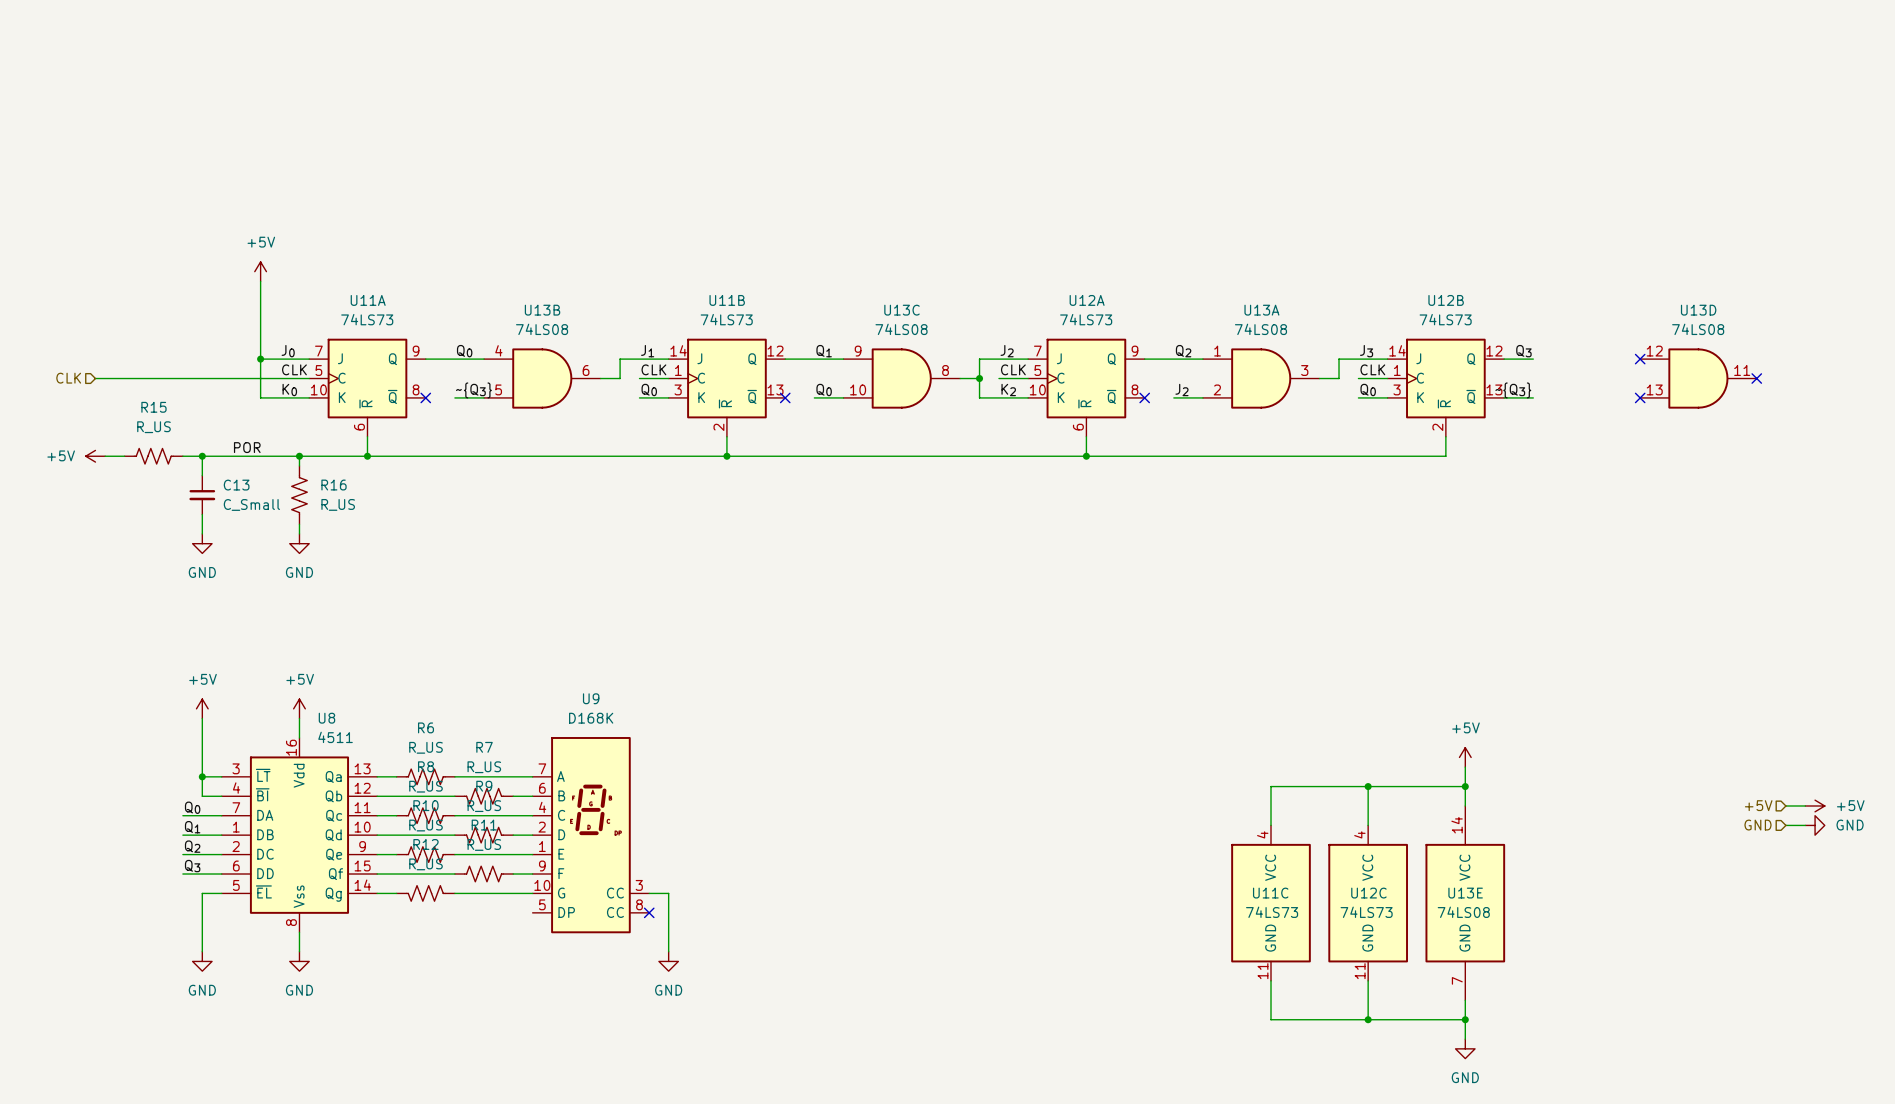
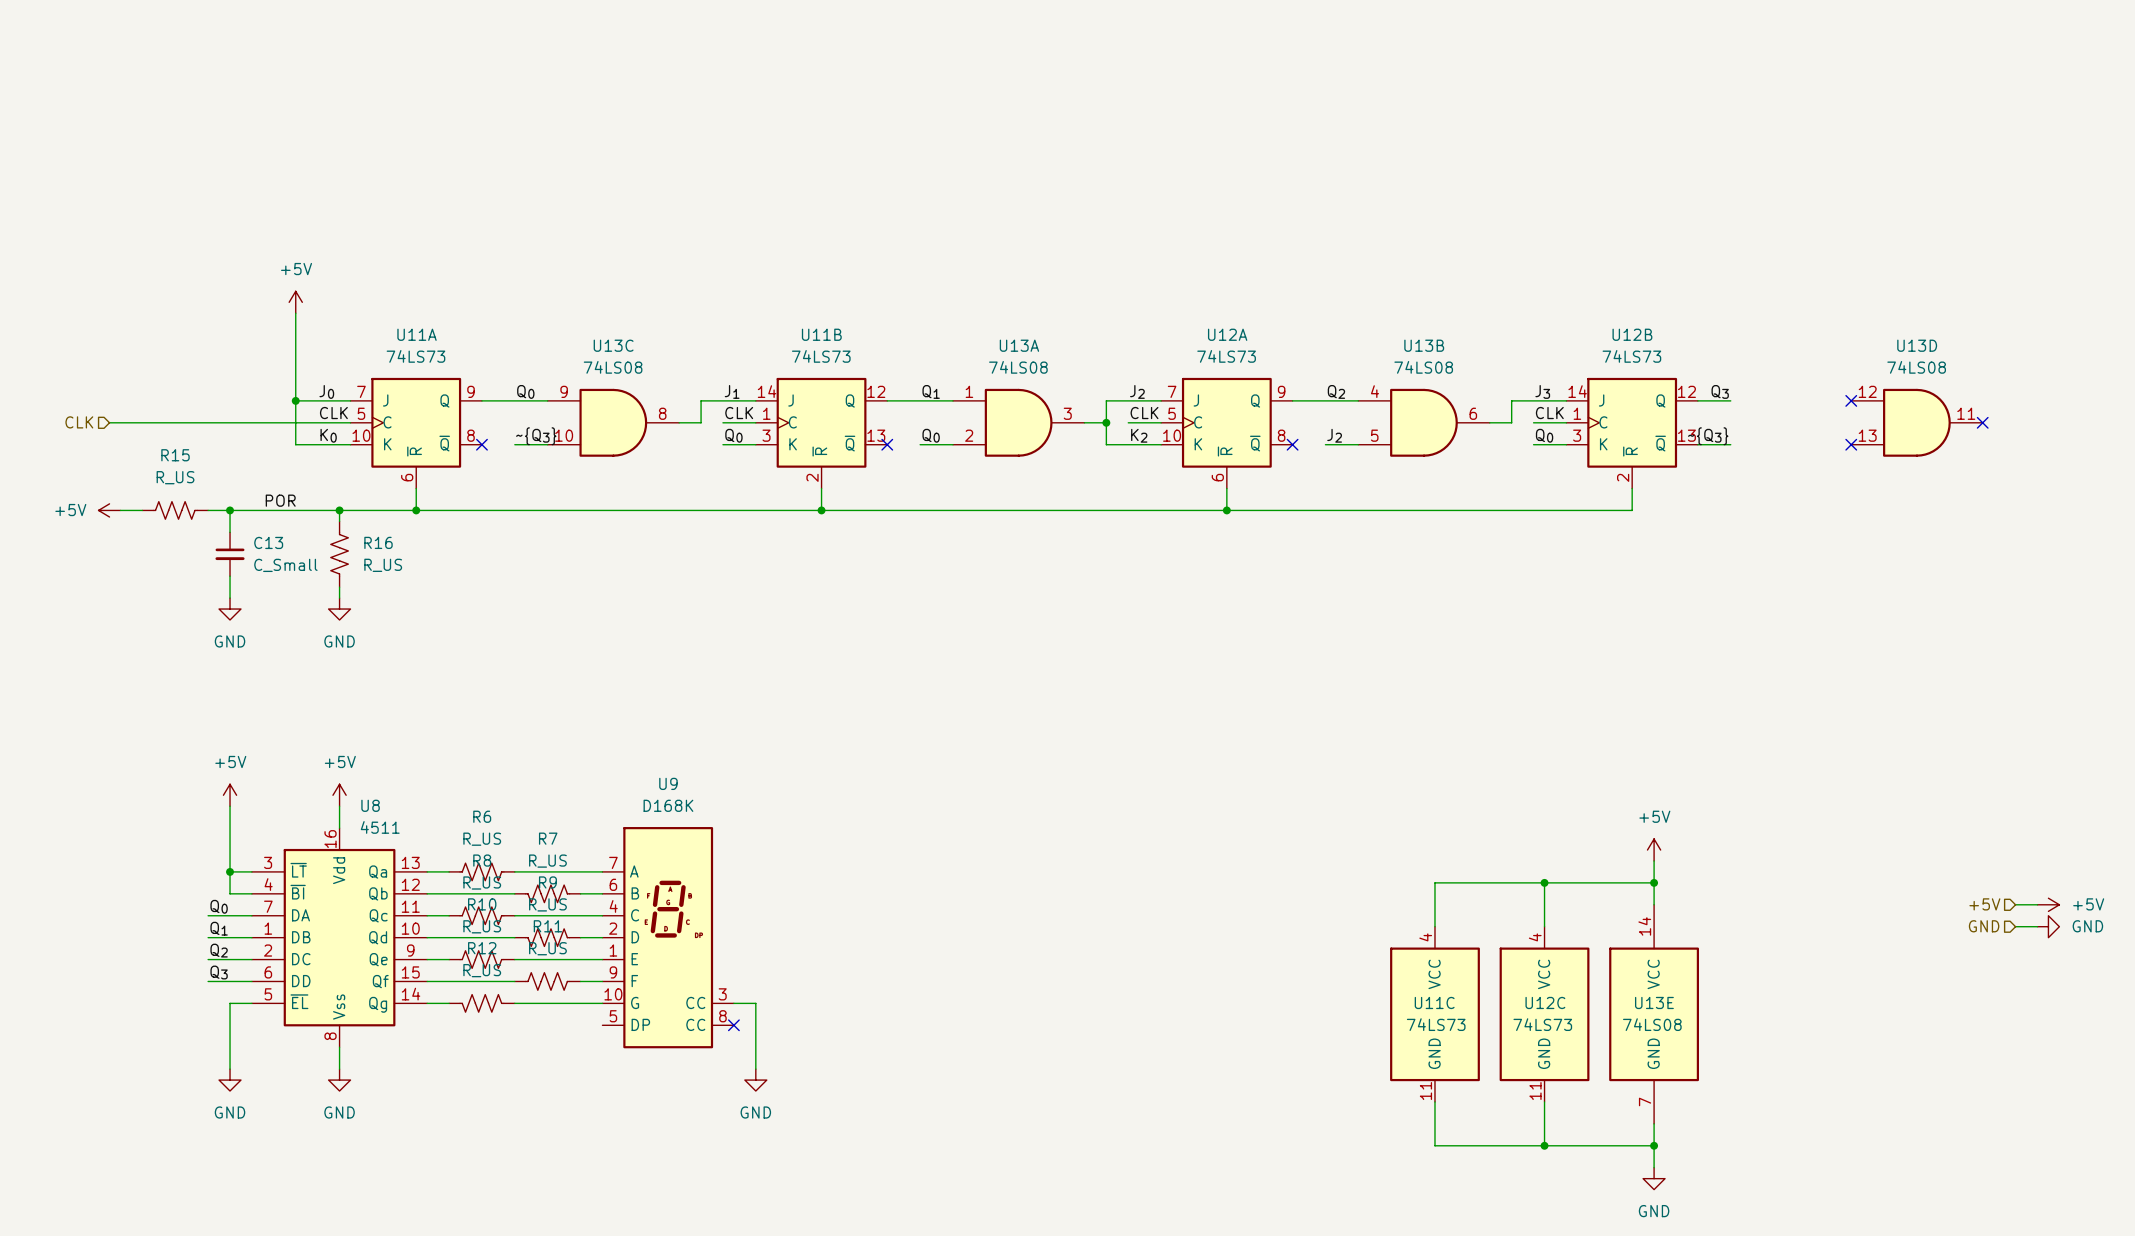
U13B position: (542, 378) -> (1424, 422)
U13C position: (901, 378) -> (613, 422)
U13A position: (1261, 378) -> (1018, 422)

